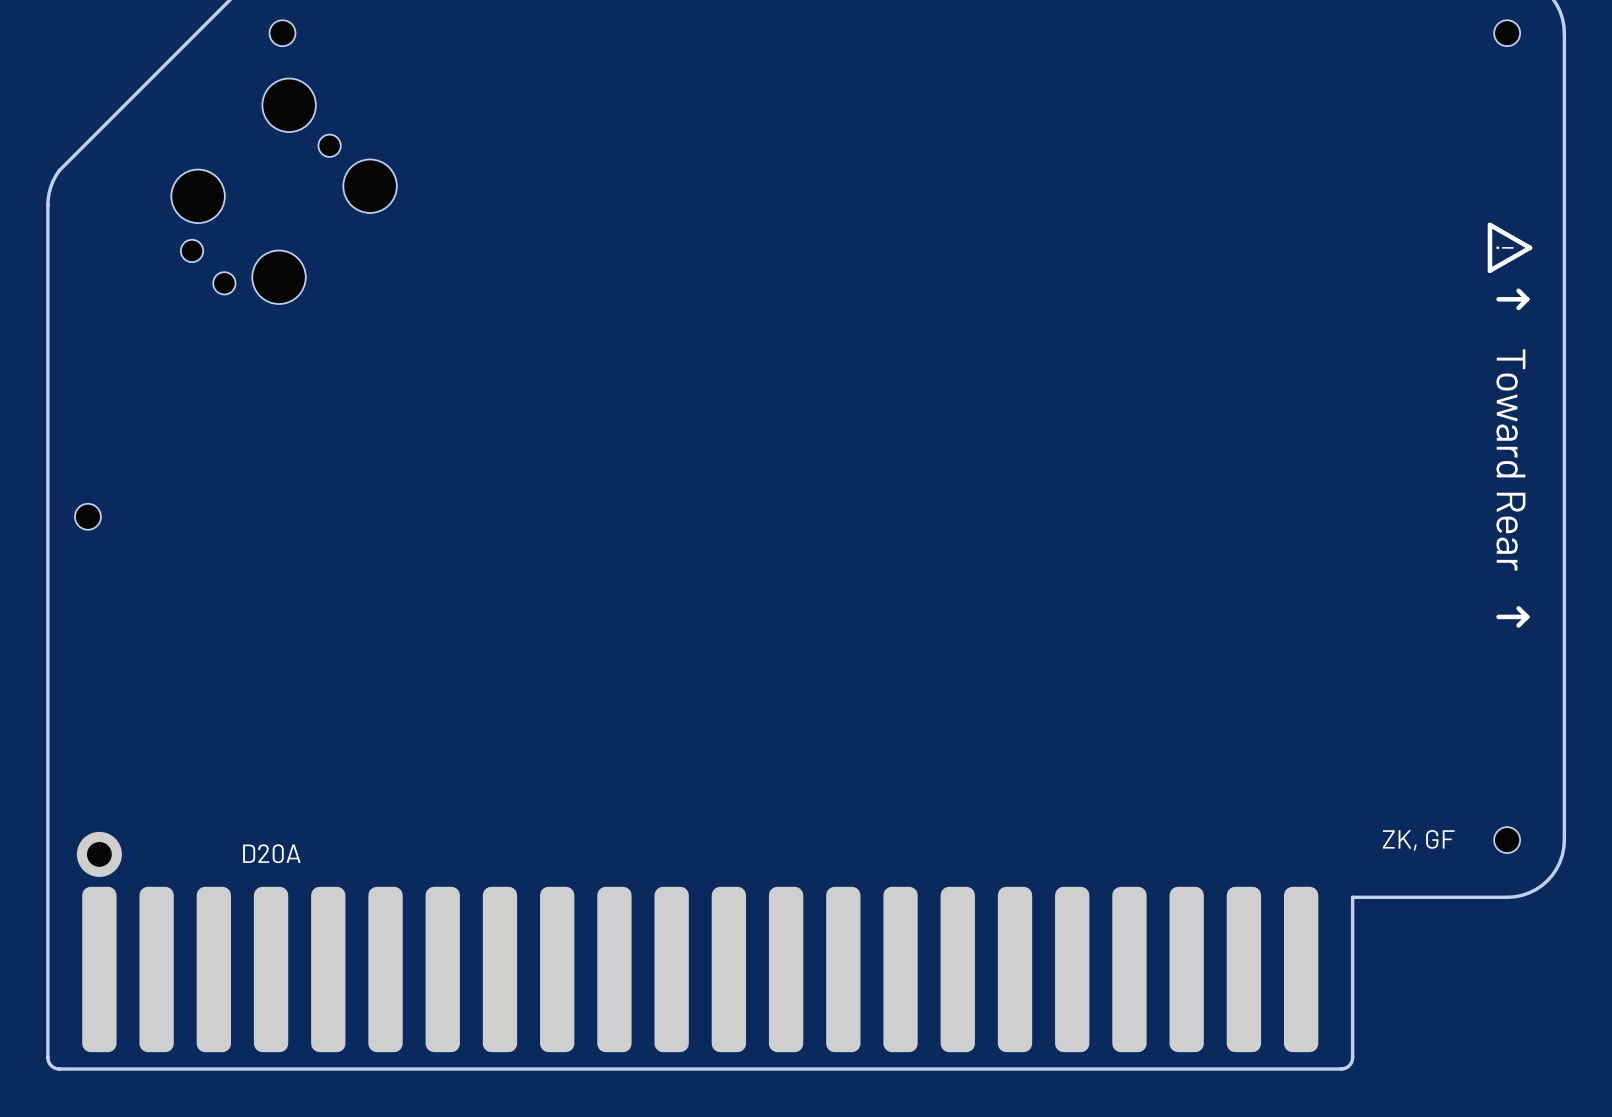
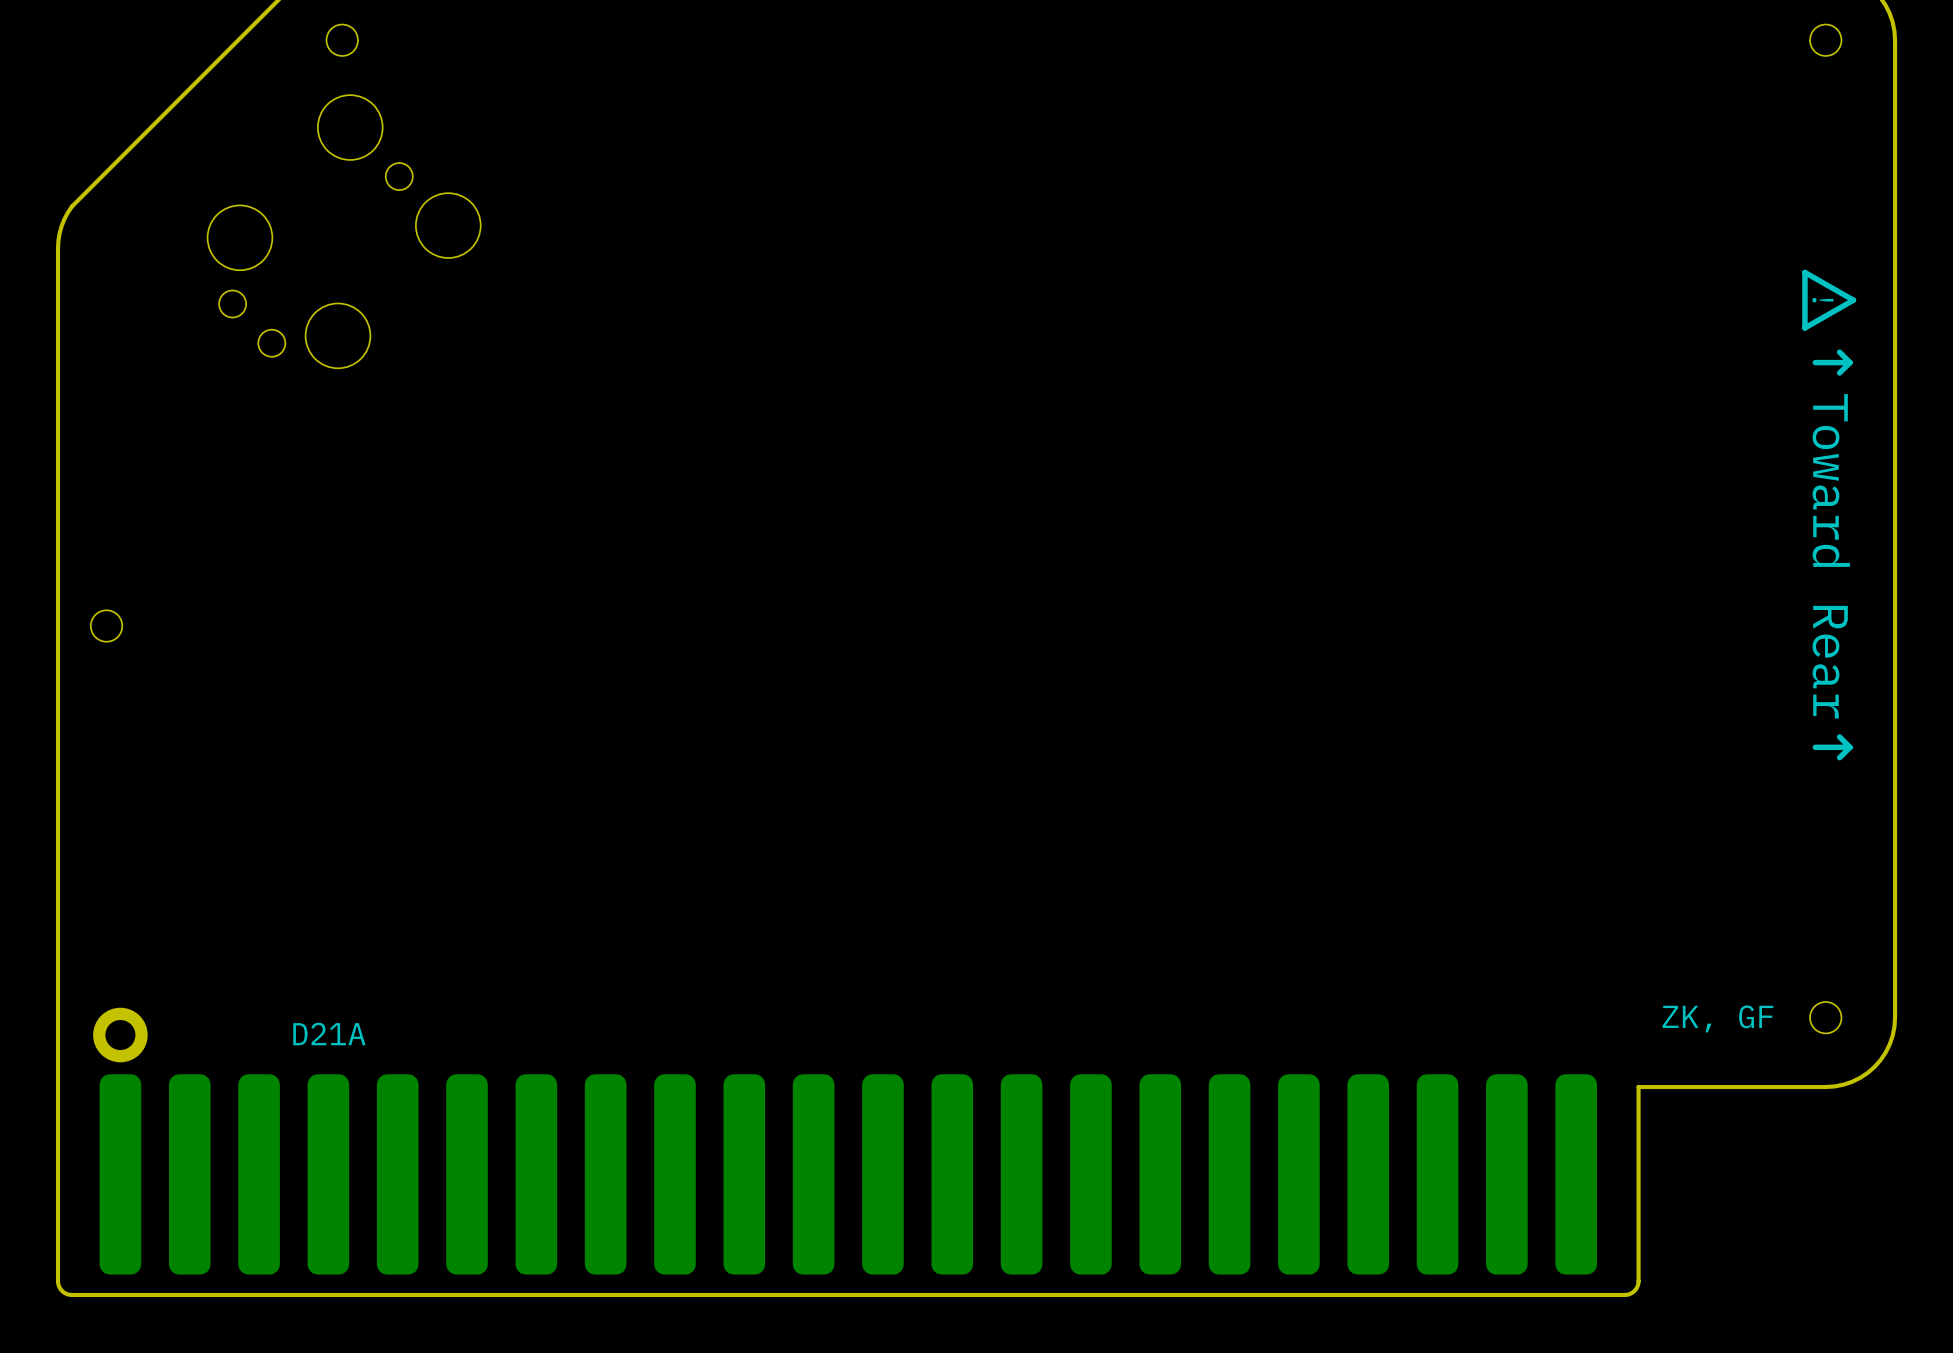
text: D20A (271, 853) -> D21A (329, 1034)

